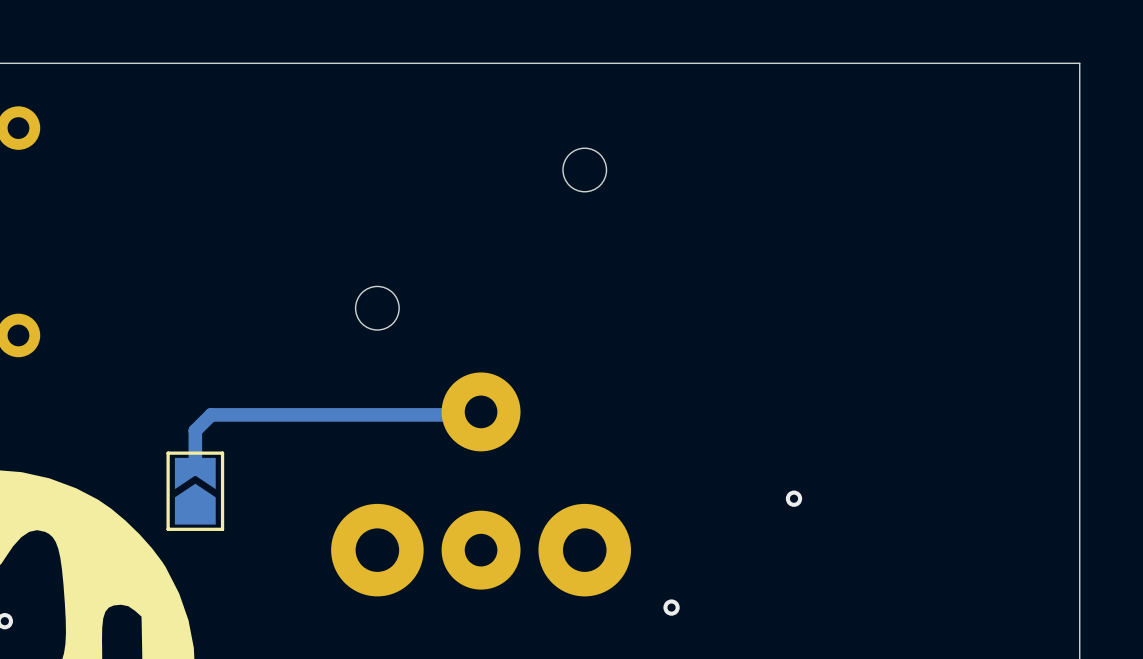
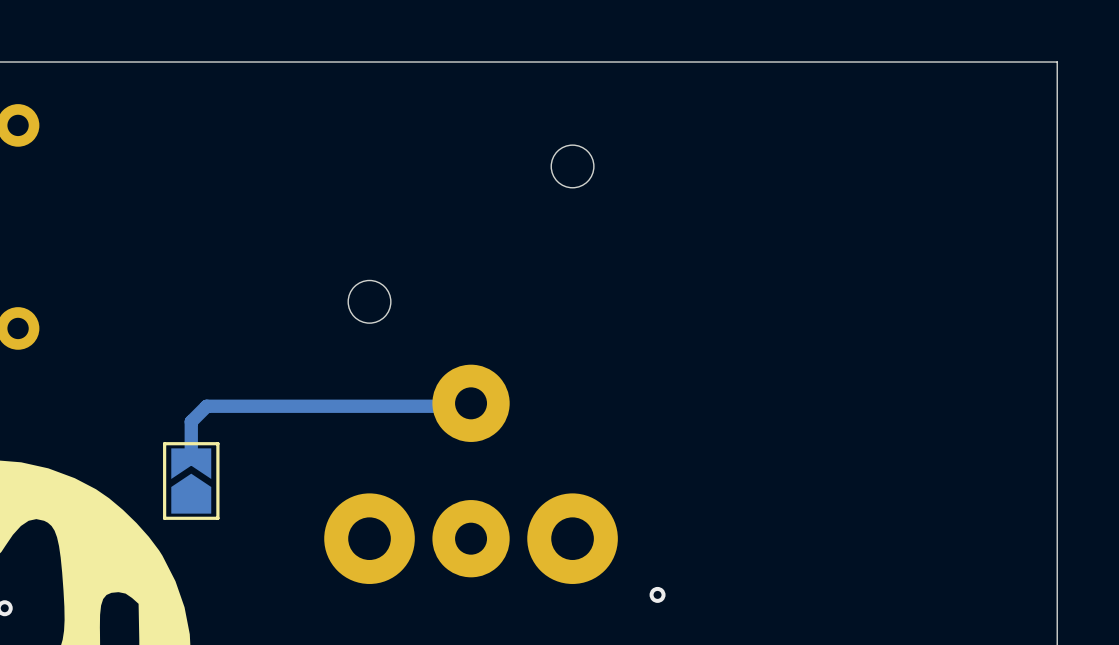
via: (794, 498) -> none

